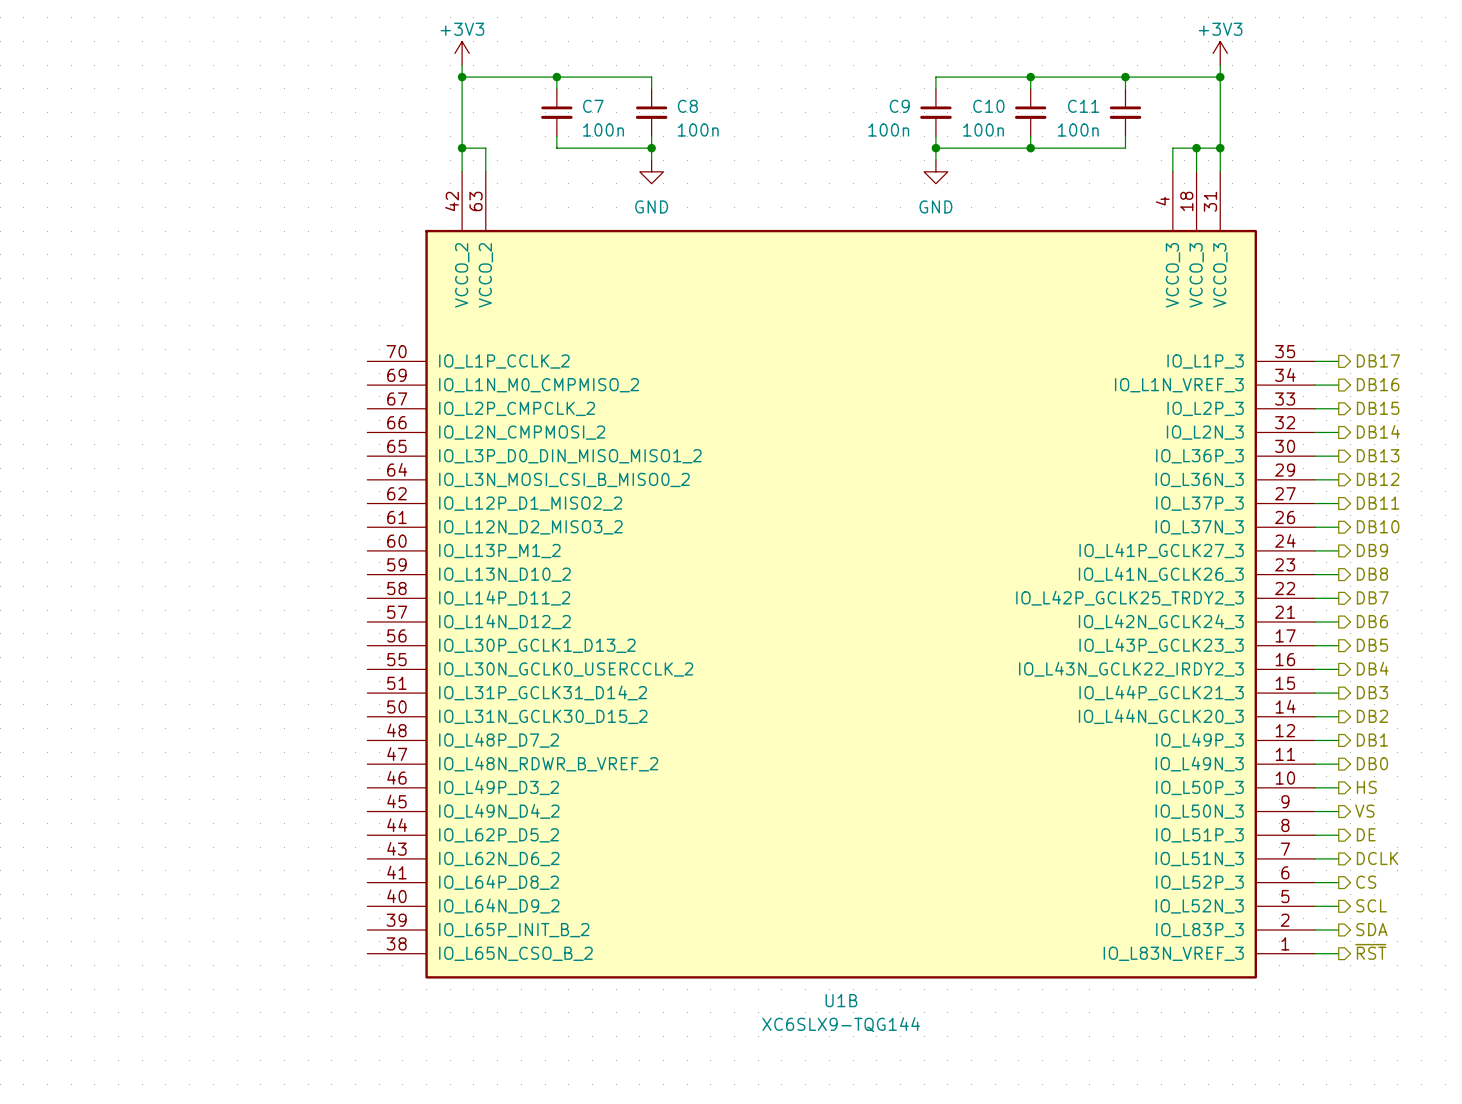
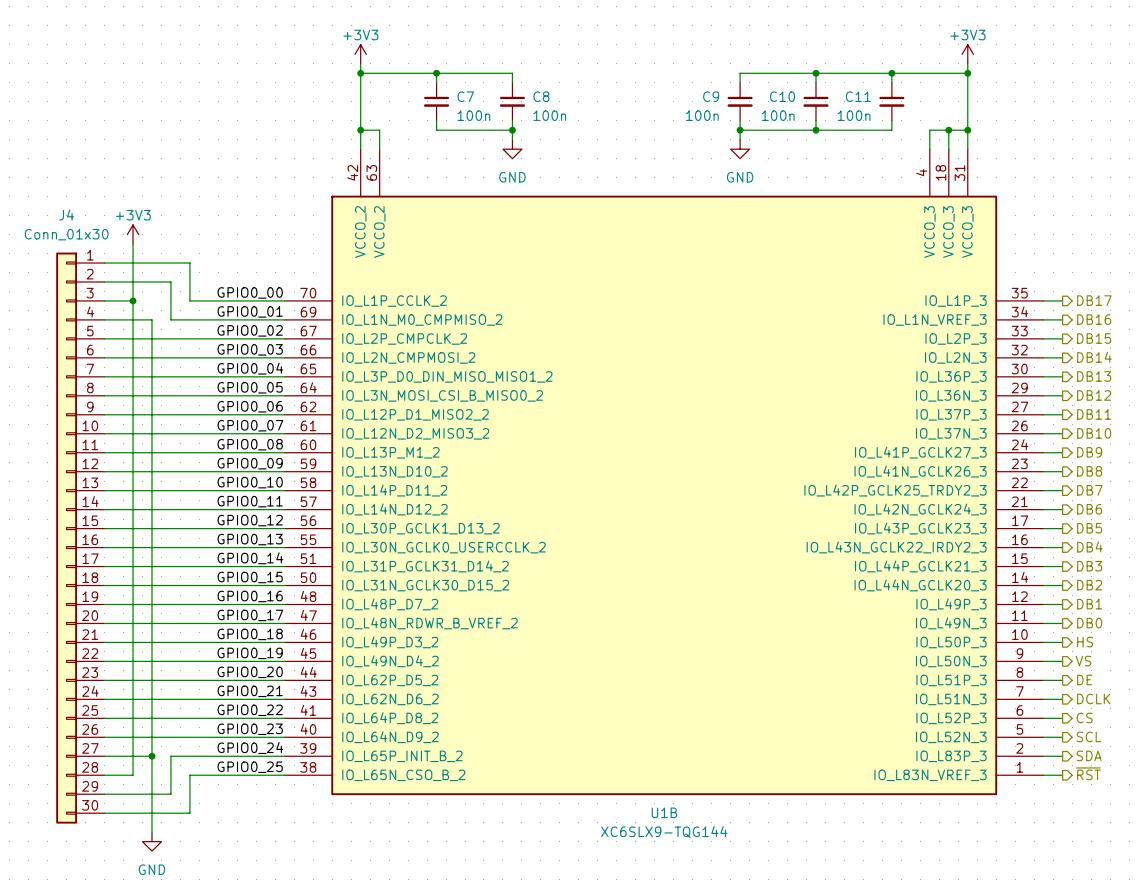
power symbol: none -> +3V3 (133, 234)
wire: none -> (133, 244) (133, 775) (104, 775)
wire: none -> (104, 263) (189, 263) (189, 300) (284, 300)
wire: none -> (104, 281) (170, 281) (170, 319) (284, 319)
label: none -> GPIO0_00 (250, 292)
wire: none -> (104, 300) (133, 300)
junction: none -> (133, 300)
label: none -> GPIO0_01 (250, 311)
wire: none -> (104, 319) (151, 319) (151, 832)
label: none -> GPIO0_02 (250, 330)
wire: none -> (104, 338) (284, 338)
label: none -> GPIO0_03 (250, 349)
wire: none -> (104, 357) (284, 357)
label: none -> GPIO0_04 (250, 368)
wire: none -> (104, 376) (284, 376)
label: none -> GPIO0_05 (250, 387)
wire: none -> (104, 395) (284, 395)
label: none -> GPIO0_06 (250, 406)
wire: none -> (104, 414) (284, 414)
label: none -> GPIO0_07 (250, 425)
wire: none -> (104, 433) (284, 433)
label: none -> GPIO0_08 (250, 444)
wire: none -> (104, 452) (284, 452)
label: none -> GPIO0_09 (250, 463)
wire: none -> (104, 471) (284, 471)
label: none -> GPIO0_10 (250, 482)
wire: none -> (104, 490) (284, 490)
label: none -> GPIO0_11 (250, 501)
wire: none -> (104, 509) (284, 509)
label: none -> GPIO0_12 (250, 520)
wire: none -> (104, 528) (284, 528)
J4: none -> Conn_01x30 (80, 538)
label: none -> GPIO0_13 (250, 539)
wire: none -> (104, 547) (284, 547)
label: none -> GPIO0_14 (250, 558)
wire: none -> (104, 566) (284, 566)
label: none -> GPIO0_15 (250, 577)
wire: none -> (104, 585) (284, 585)
label: none -> GPIO0_16 (250, 596)
wire: none -> (104, 604) (284, 604)
label: none -> GPIO0_17 (250, 615)
wire: none -> (104, 623) (284, 623)
label: none -> GPIO0_18 (250, 634)
wire: none -> (104, 642) (284, 642)
label: none -> GPIO0_19 (250, 653)
wire: none -> (104, 661) (284, 661)
label: none -> GPIO0_20 (250, 672)
wire: none -> (104, 680) (284, 680)
label: none -> GPIO0_21 (250, 691)
wire: none -> (104, 699) (284, 699)
label: none -> GPIO0_22 (250, 710)
wire: none -> (104, 718) (284, 718)
label: none -> GPIO0_23 (250, 729)
wire: none -> (104, 737) (284, 737)
label: none -> GPIO0_24 (250, 748)
wire: none -> (104, 756) (151, 756)
junction: none -> (151, 756)
wire: none -> (284, 756) (170, 756) (170, 794) (104, 794)
label: none -> GPIO0_25 (250, 767)
wire: none -> (284, 775) (189, 775) (189, 813) (104, 813)
power symbol: none -> GND (151, 841)

